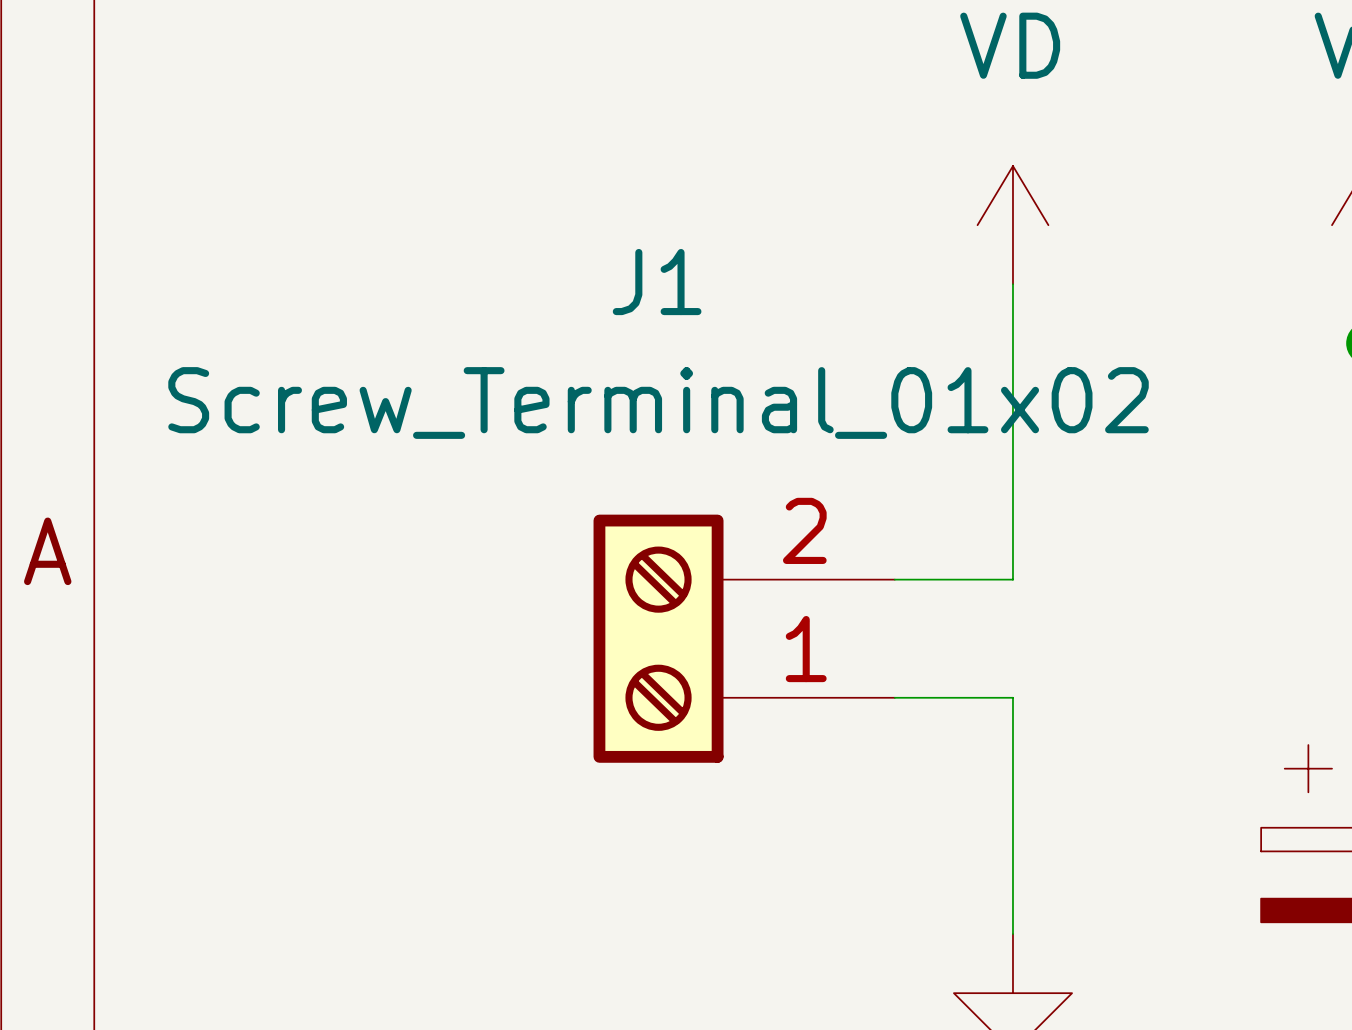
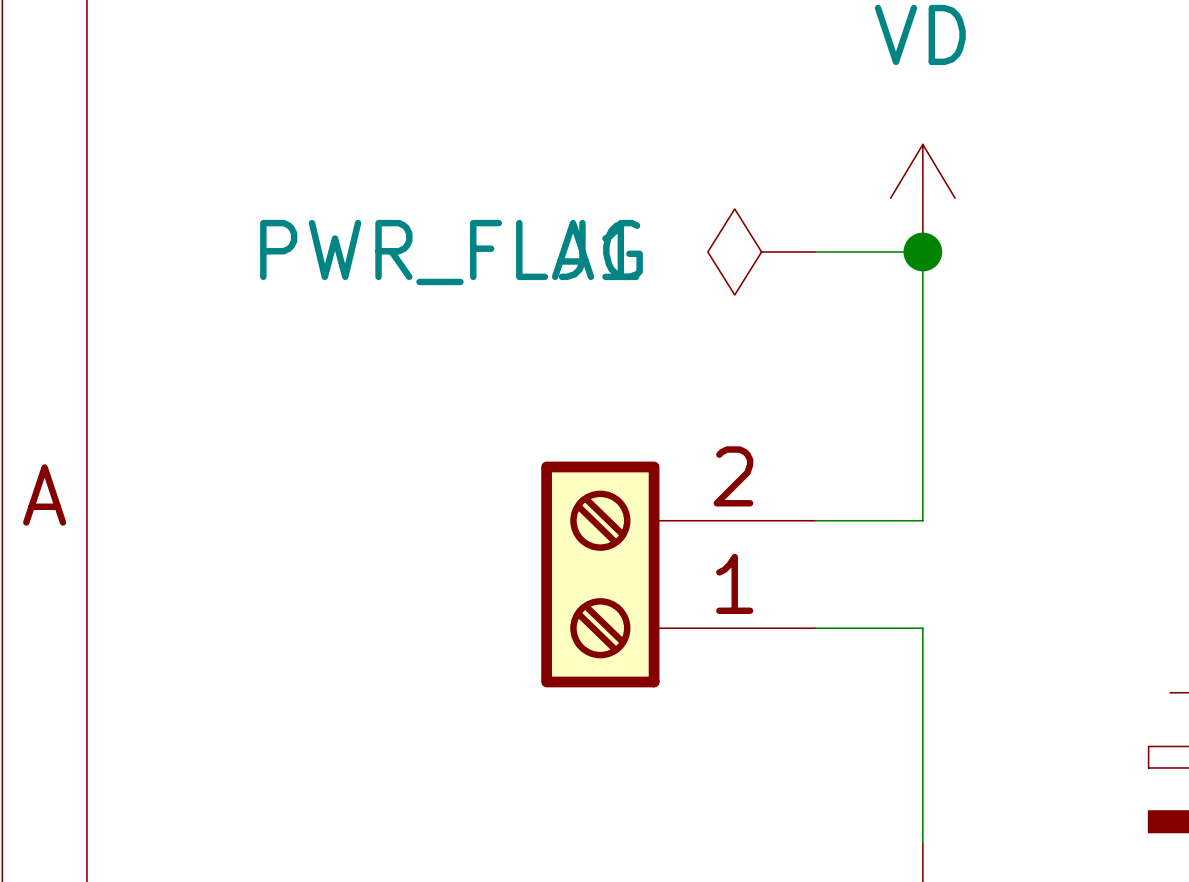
power symbol: none -> PWR_FLAG (761, 251)
wire: none -> (815, 251) (922, 251)
junction: none -> (922, 251)
J1 value: Screw_Terminal_01x02 (658, 403) -> none

